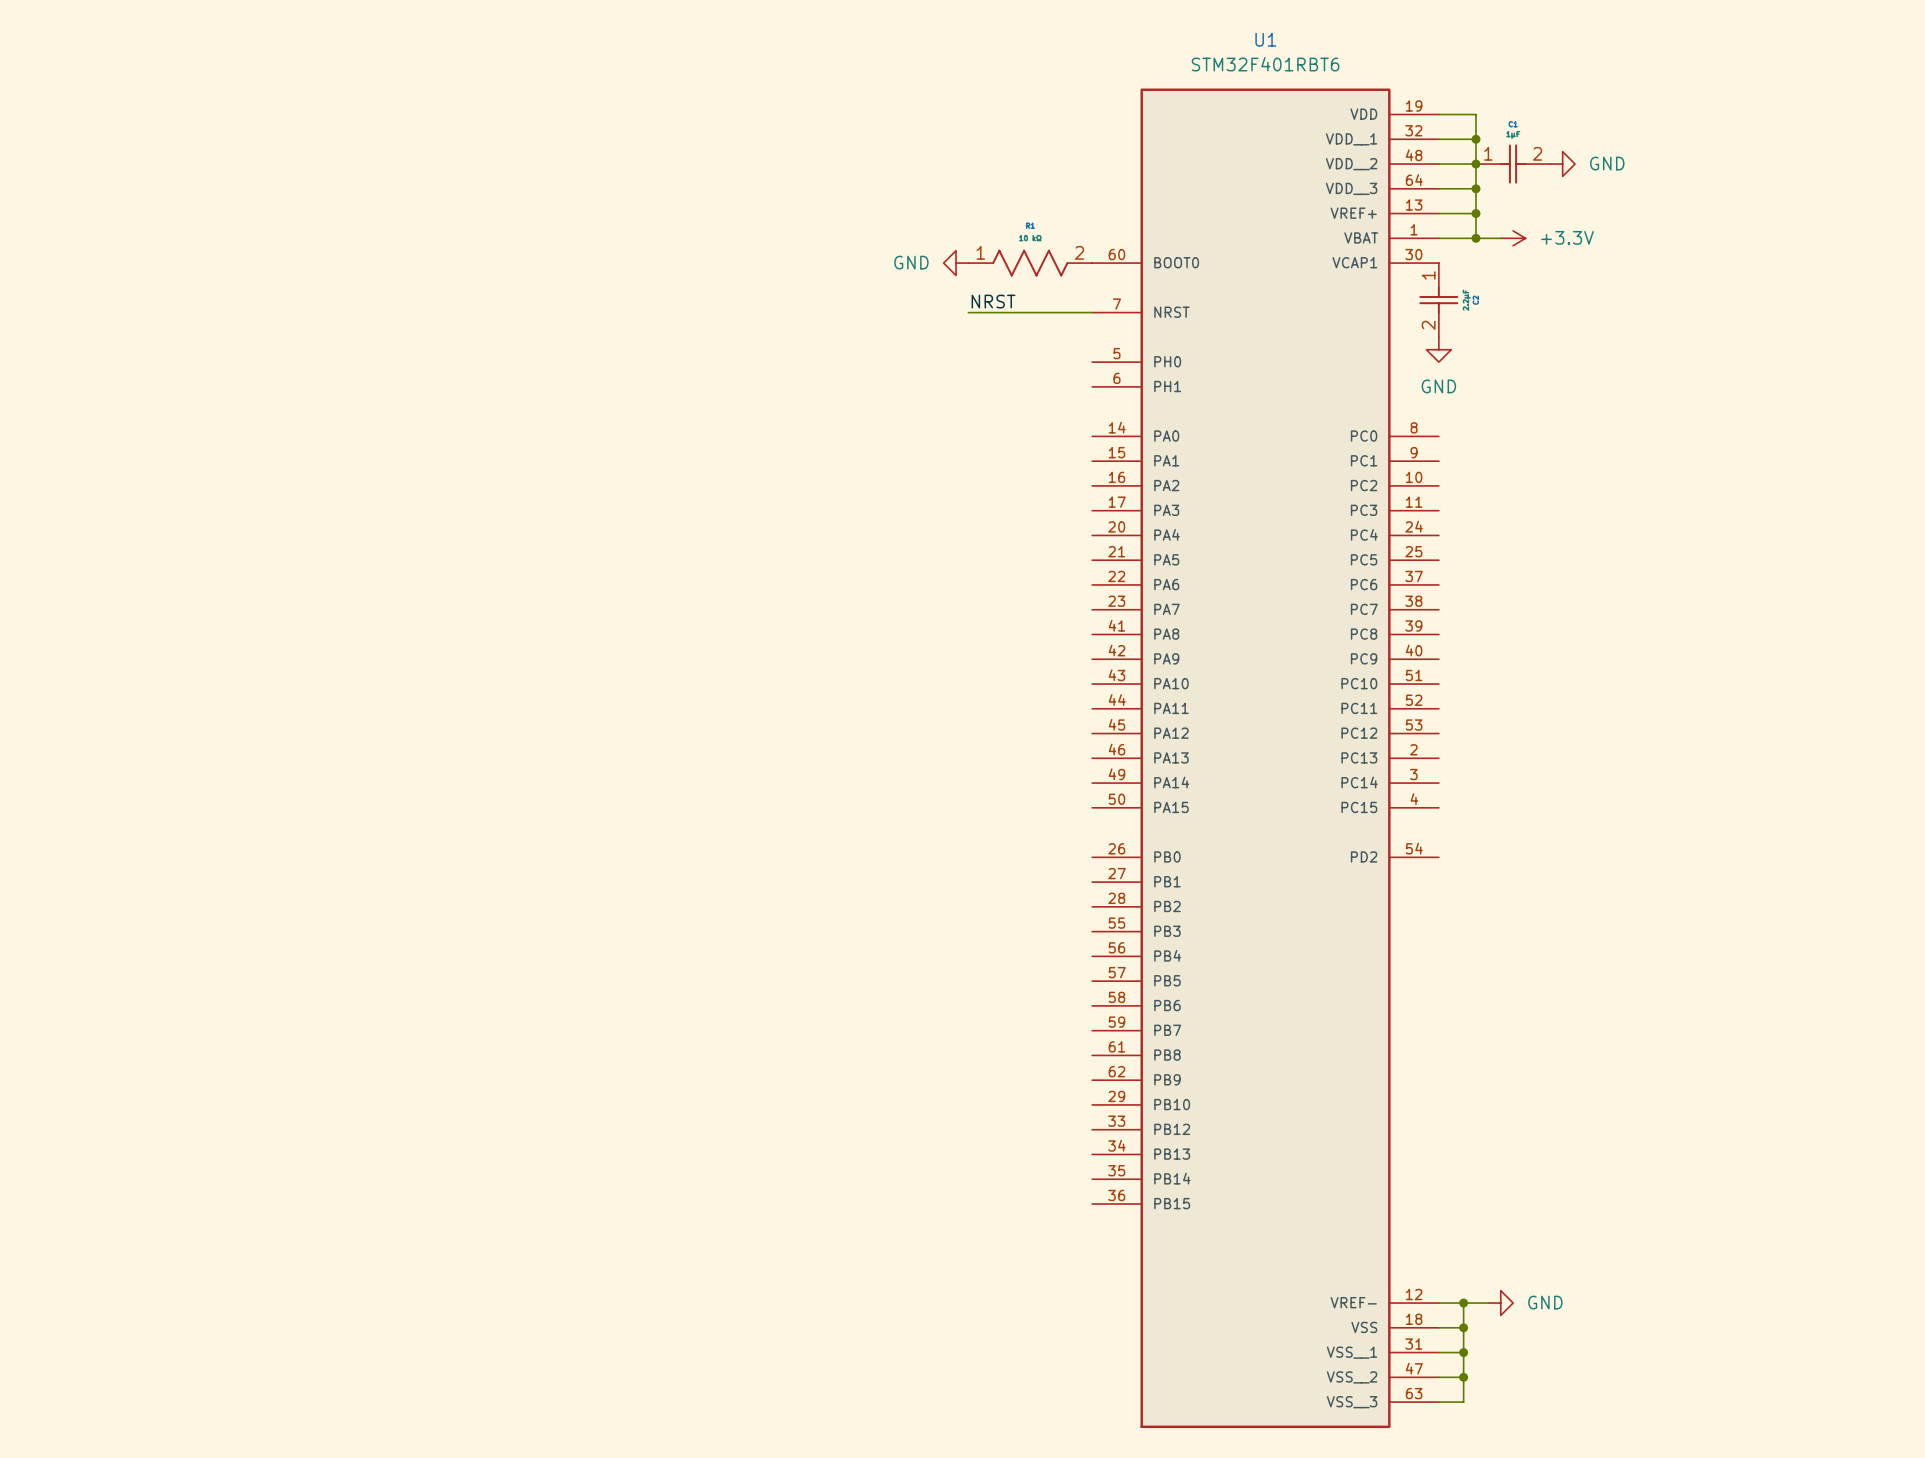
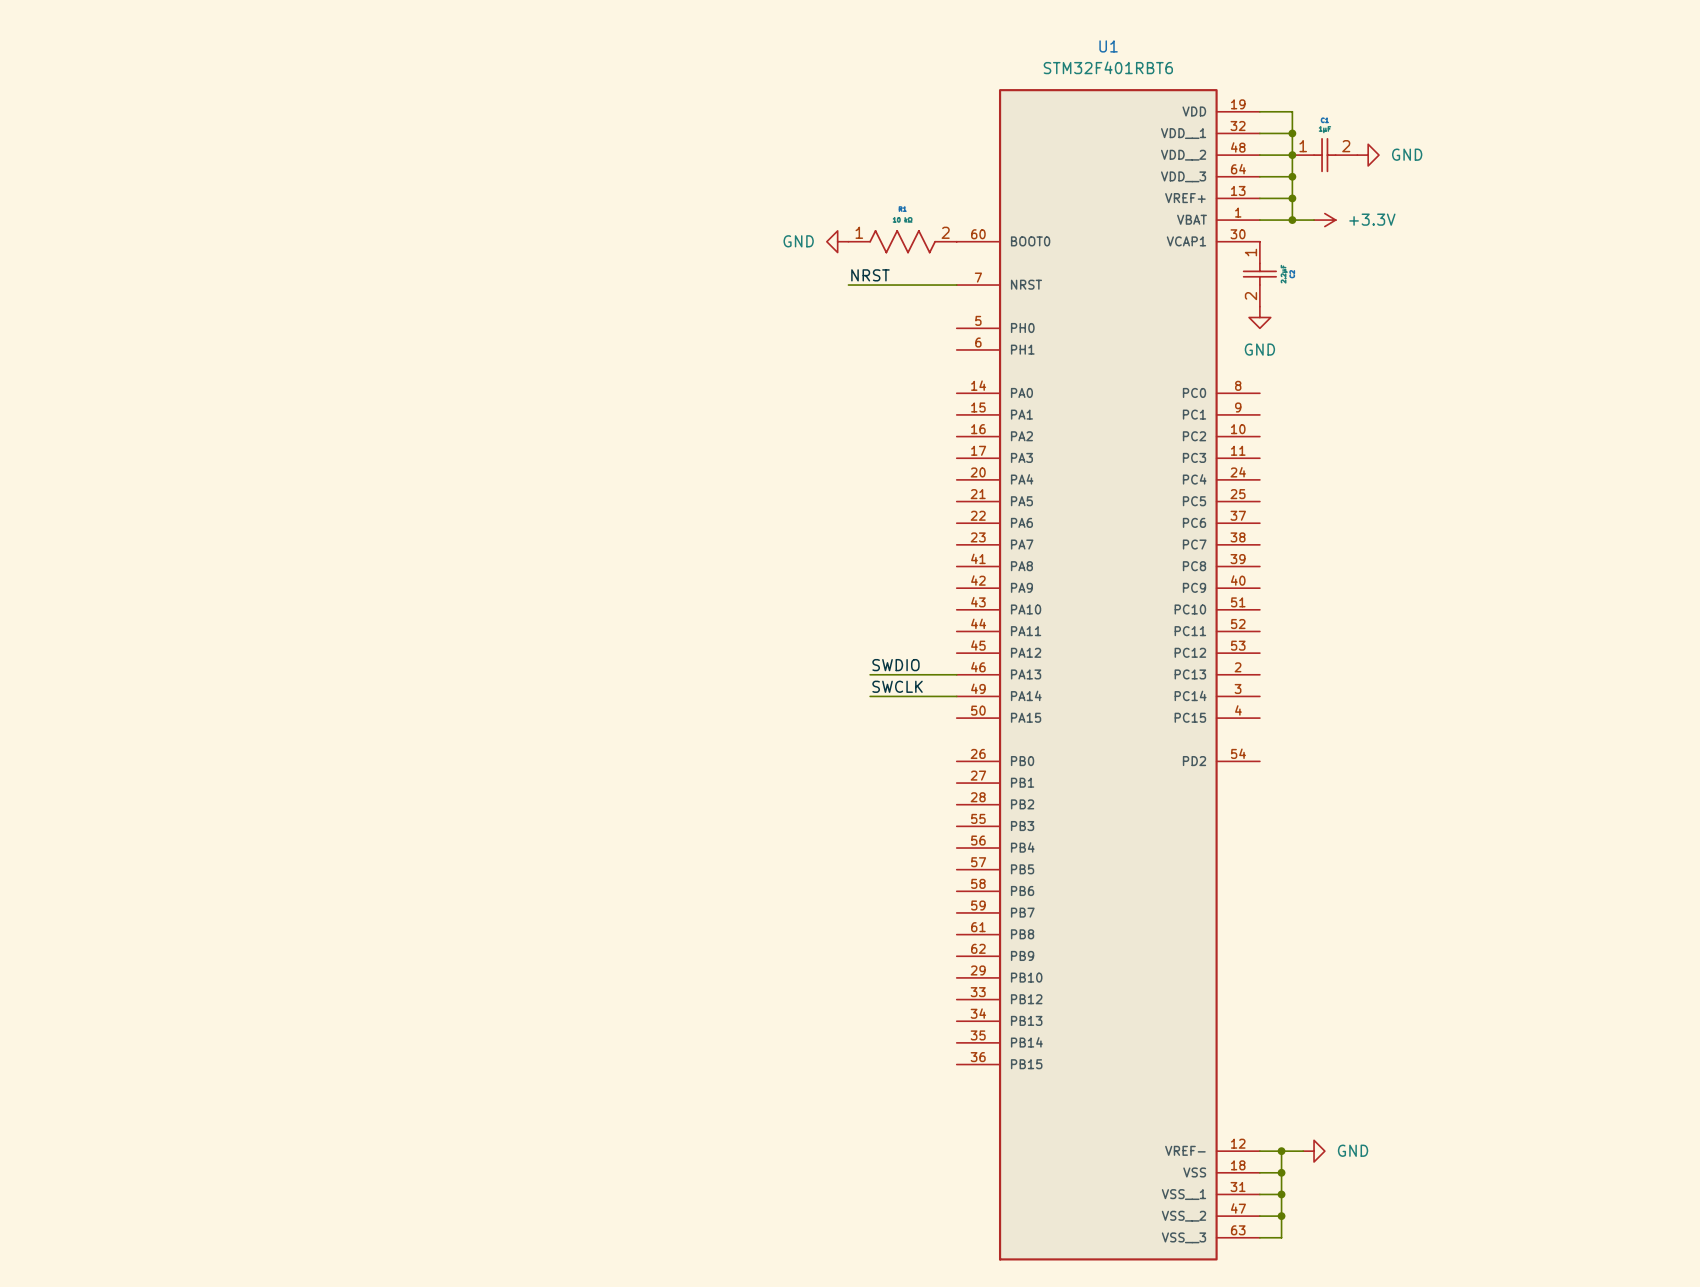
label: none -> SWDIO (895, 665)
wire: none -> (870, 674) (956, 674)
label: none -> SWCLK (897, 686)
wire: none -> (870, 696) (956, 696)

